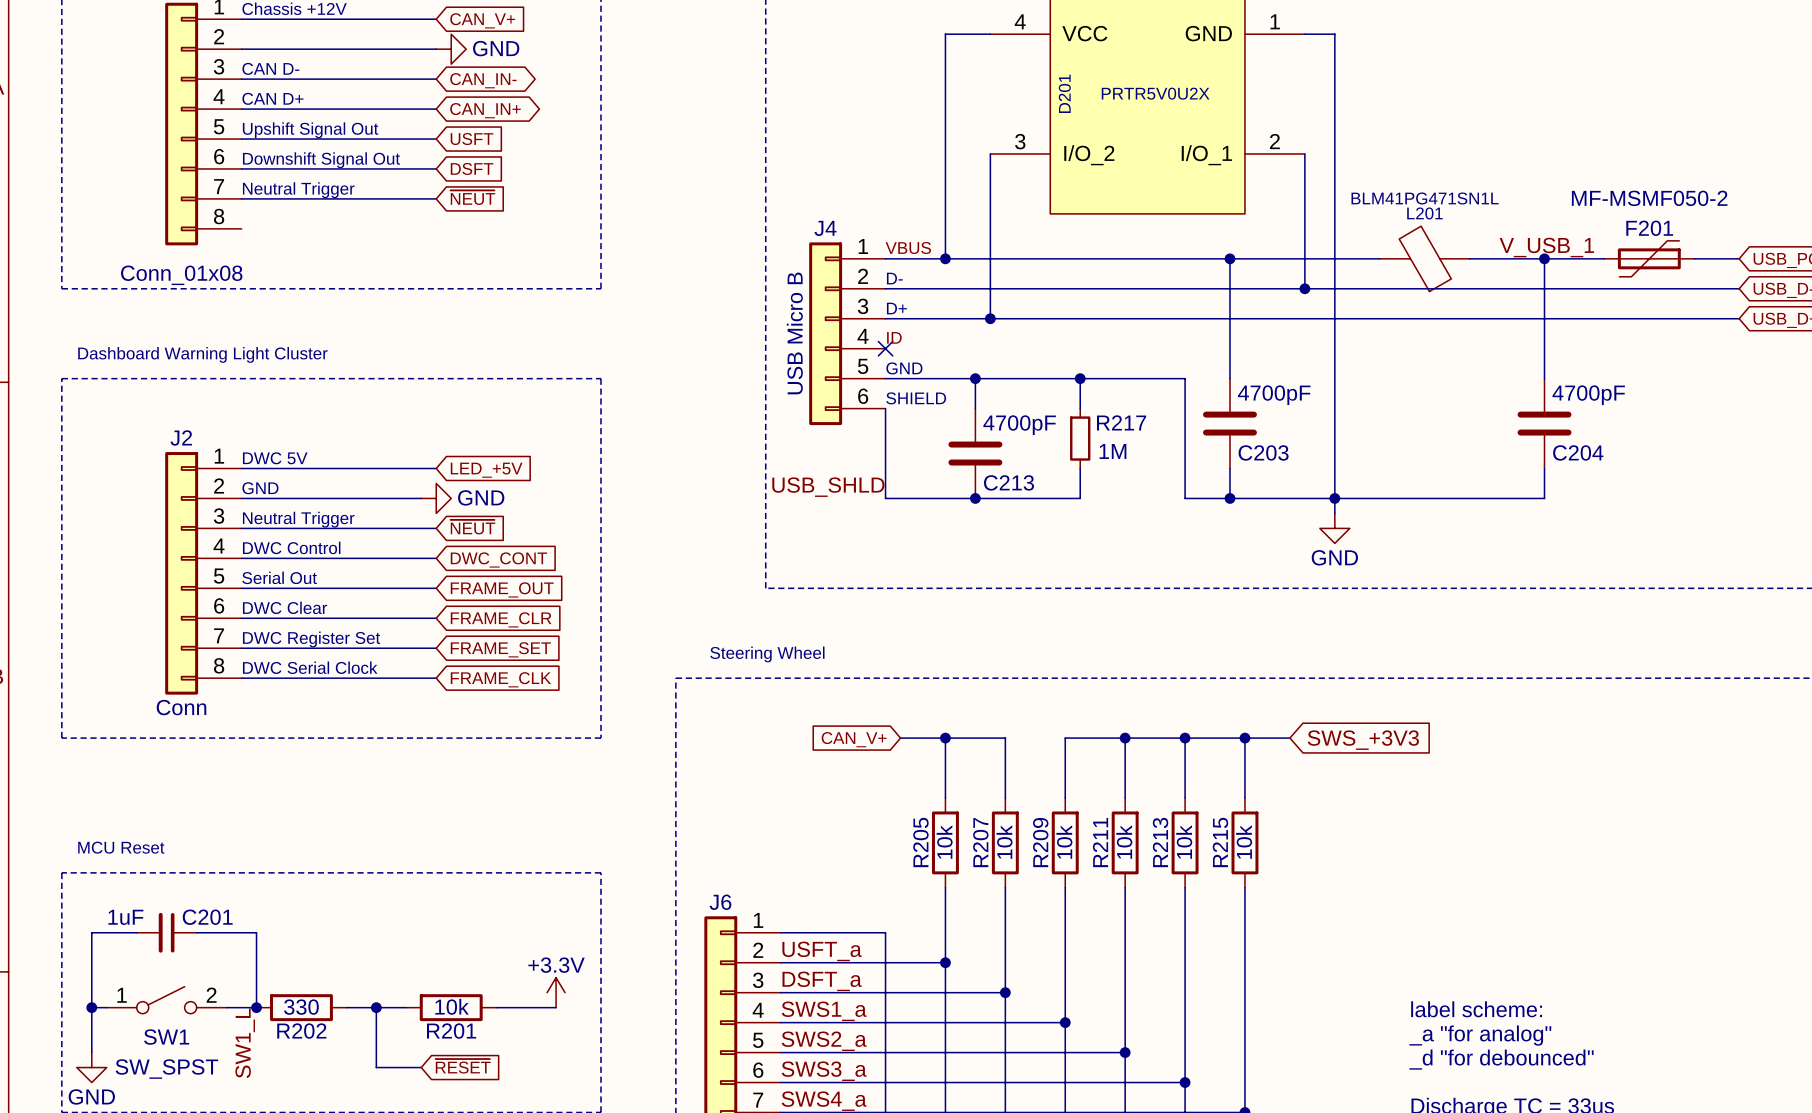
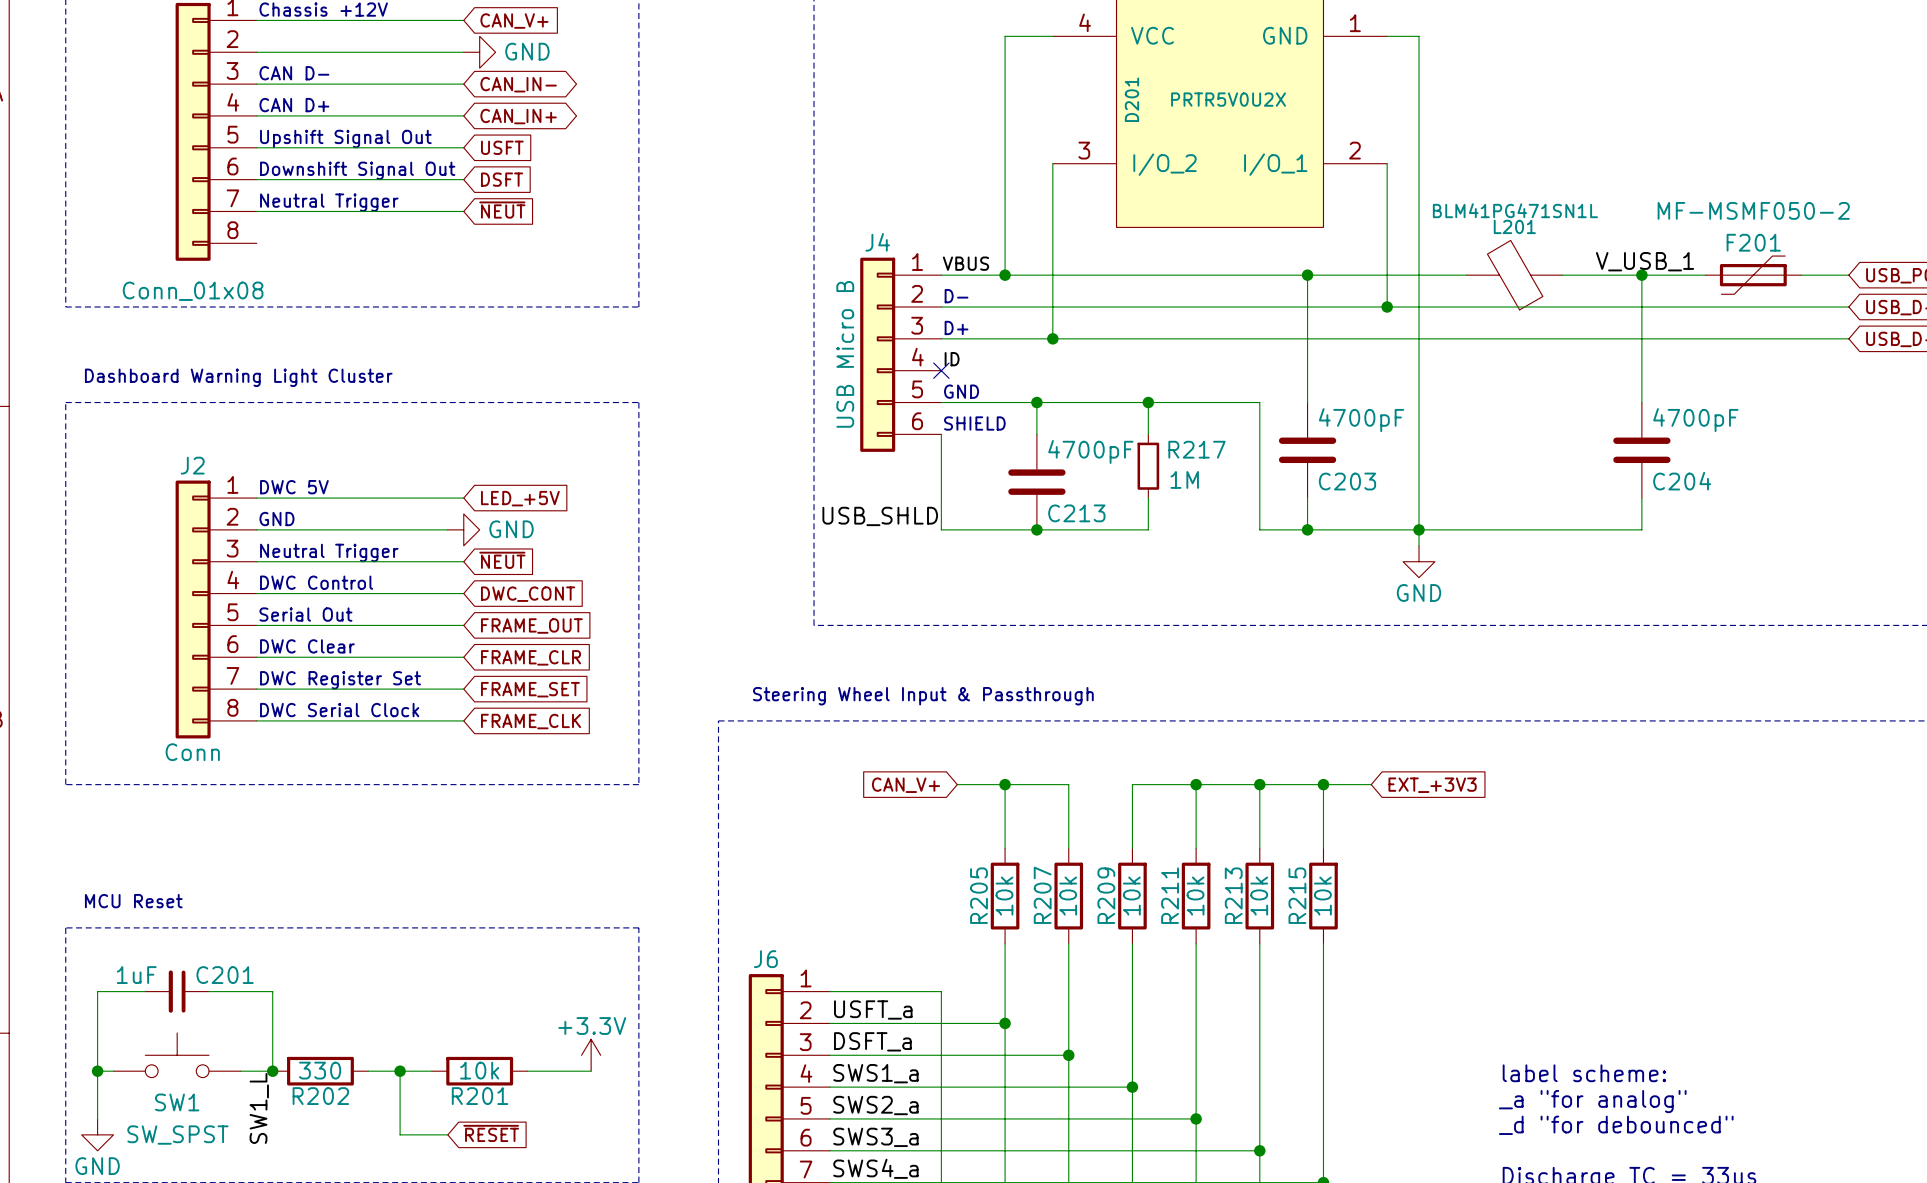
text: Steering Wheel (767, 654) -> none
text: none -> Steering Wheel Input & Passthrough (923, 696)
global label: SWS_+3V3 (1363, 740) -> EXT_+3V3 (1432, 785)
SW1 symbol: [106, 986, 227, 1014] -> [113, 1032, 241, 1078]

